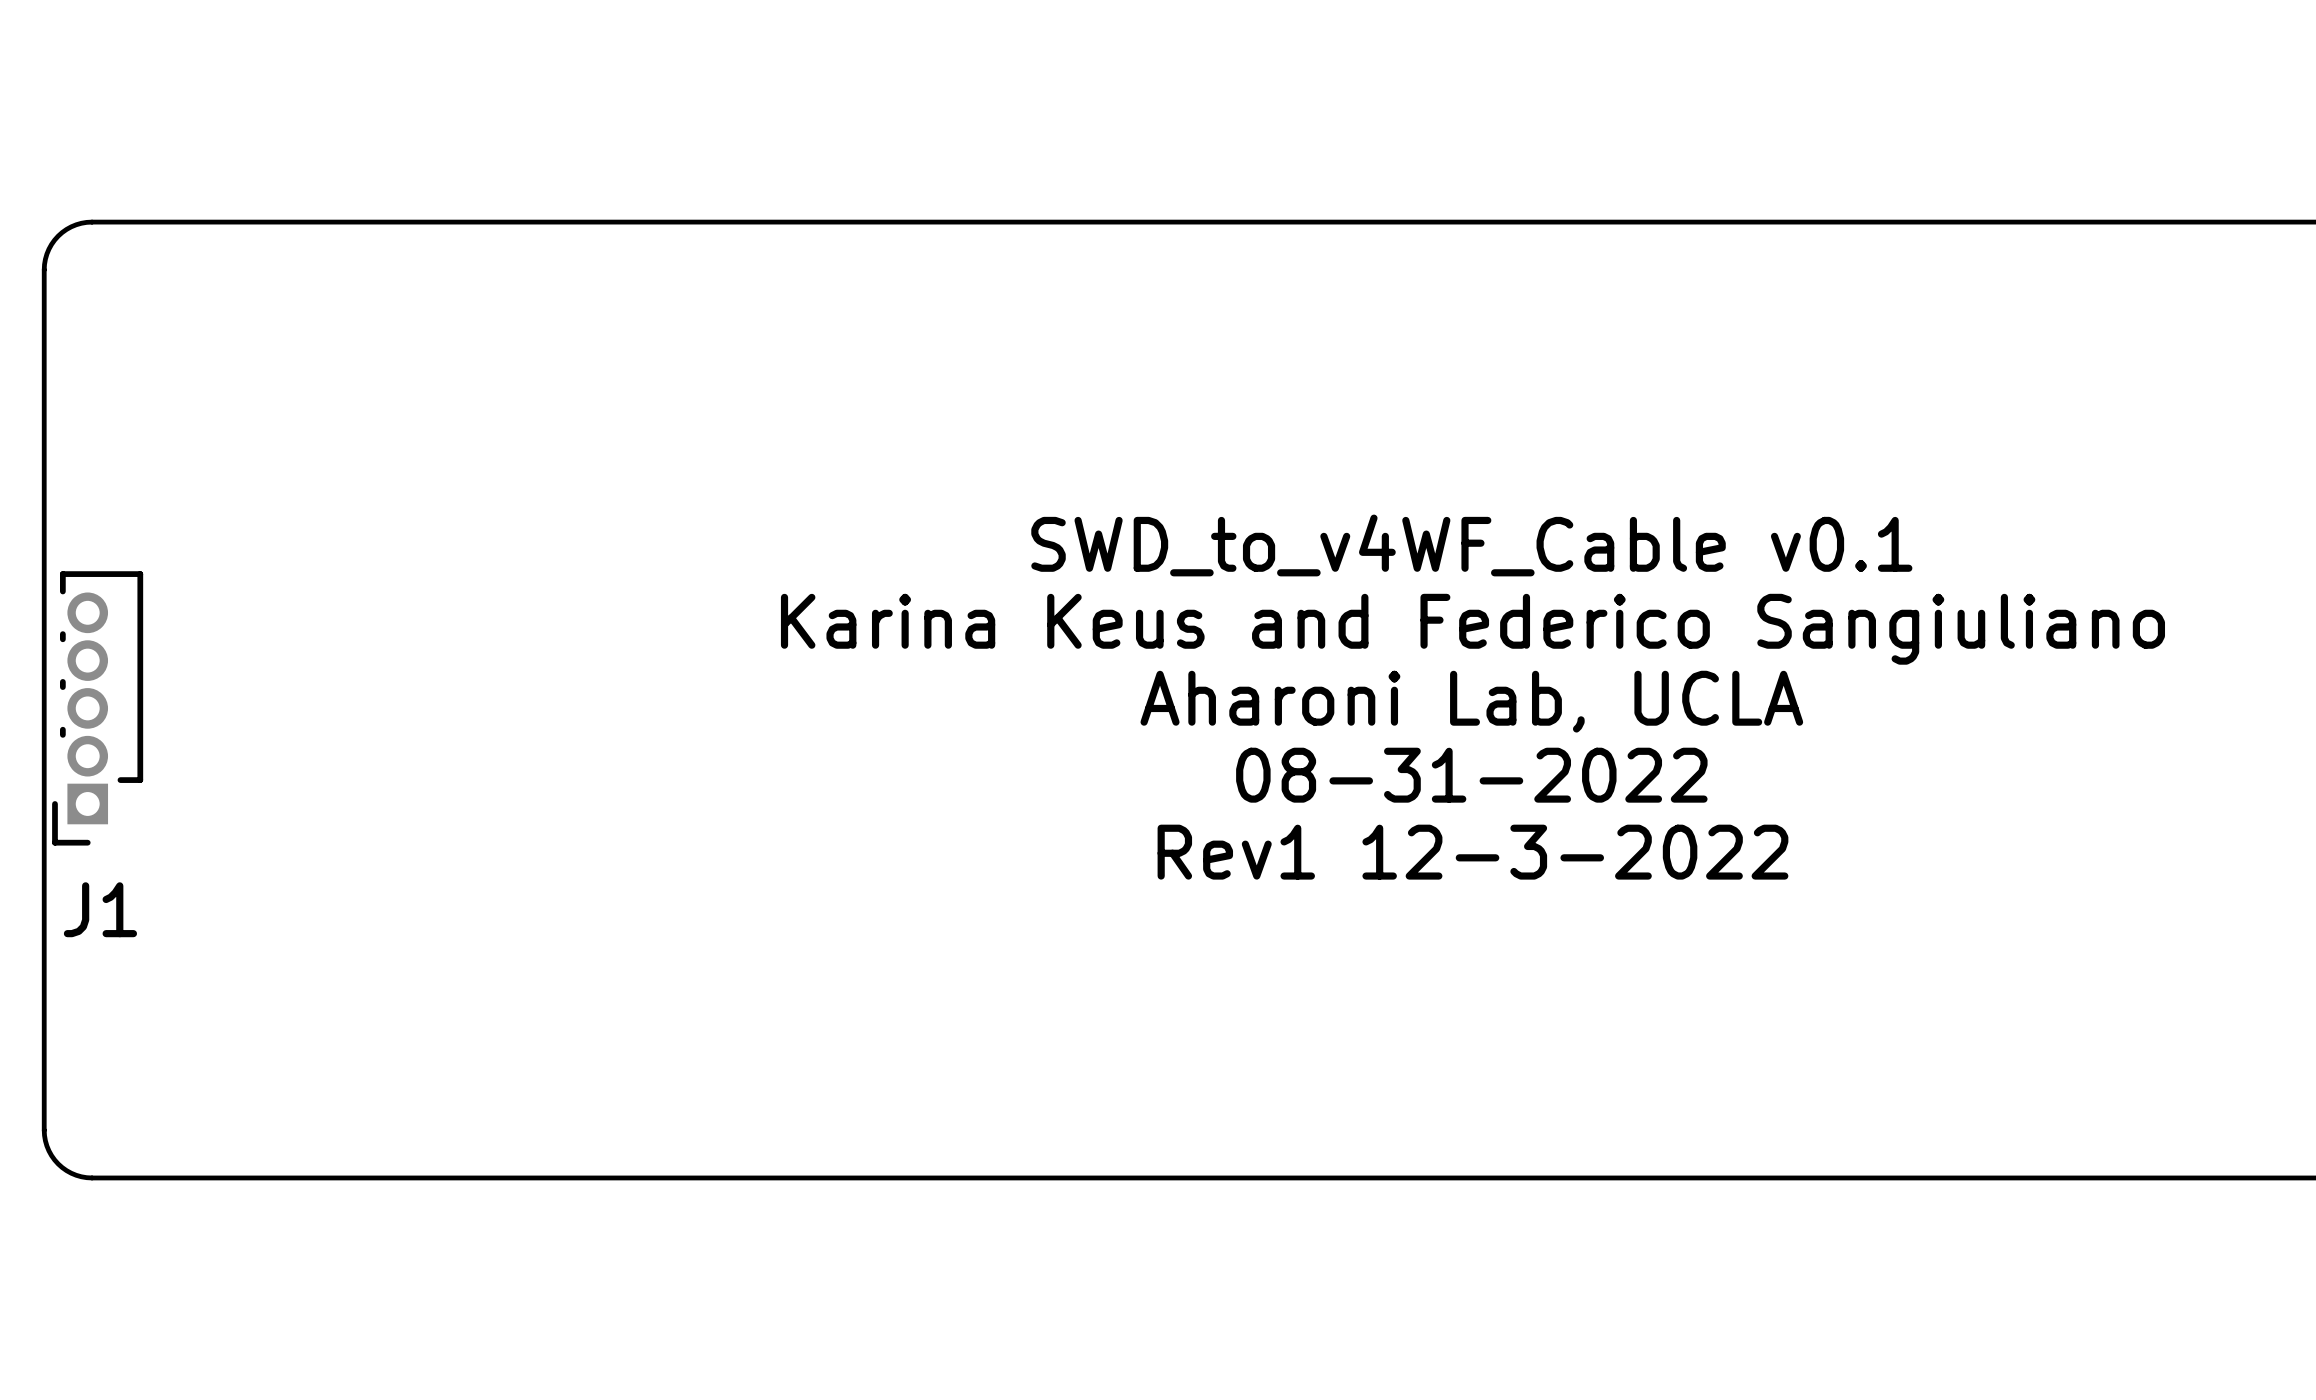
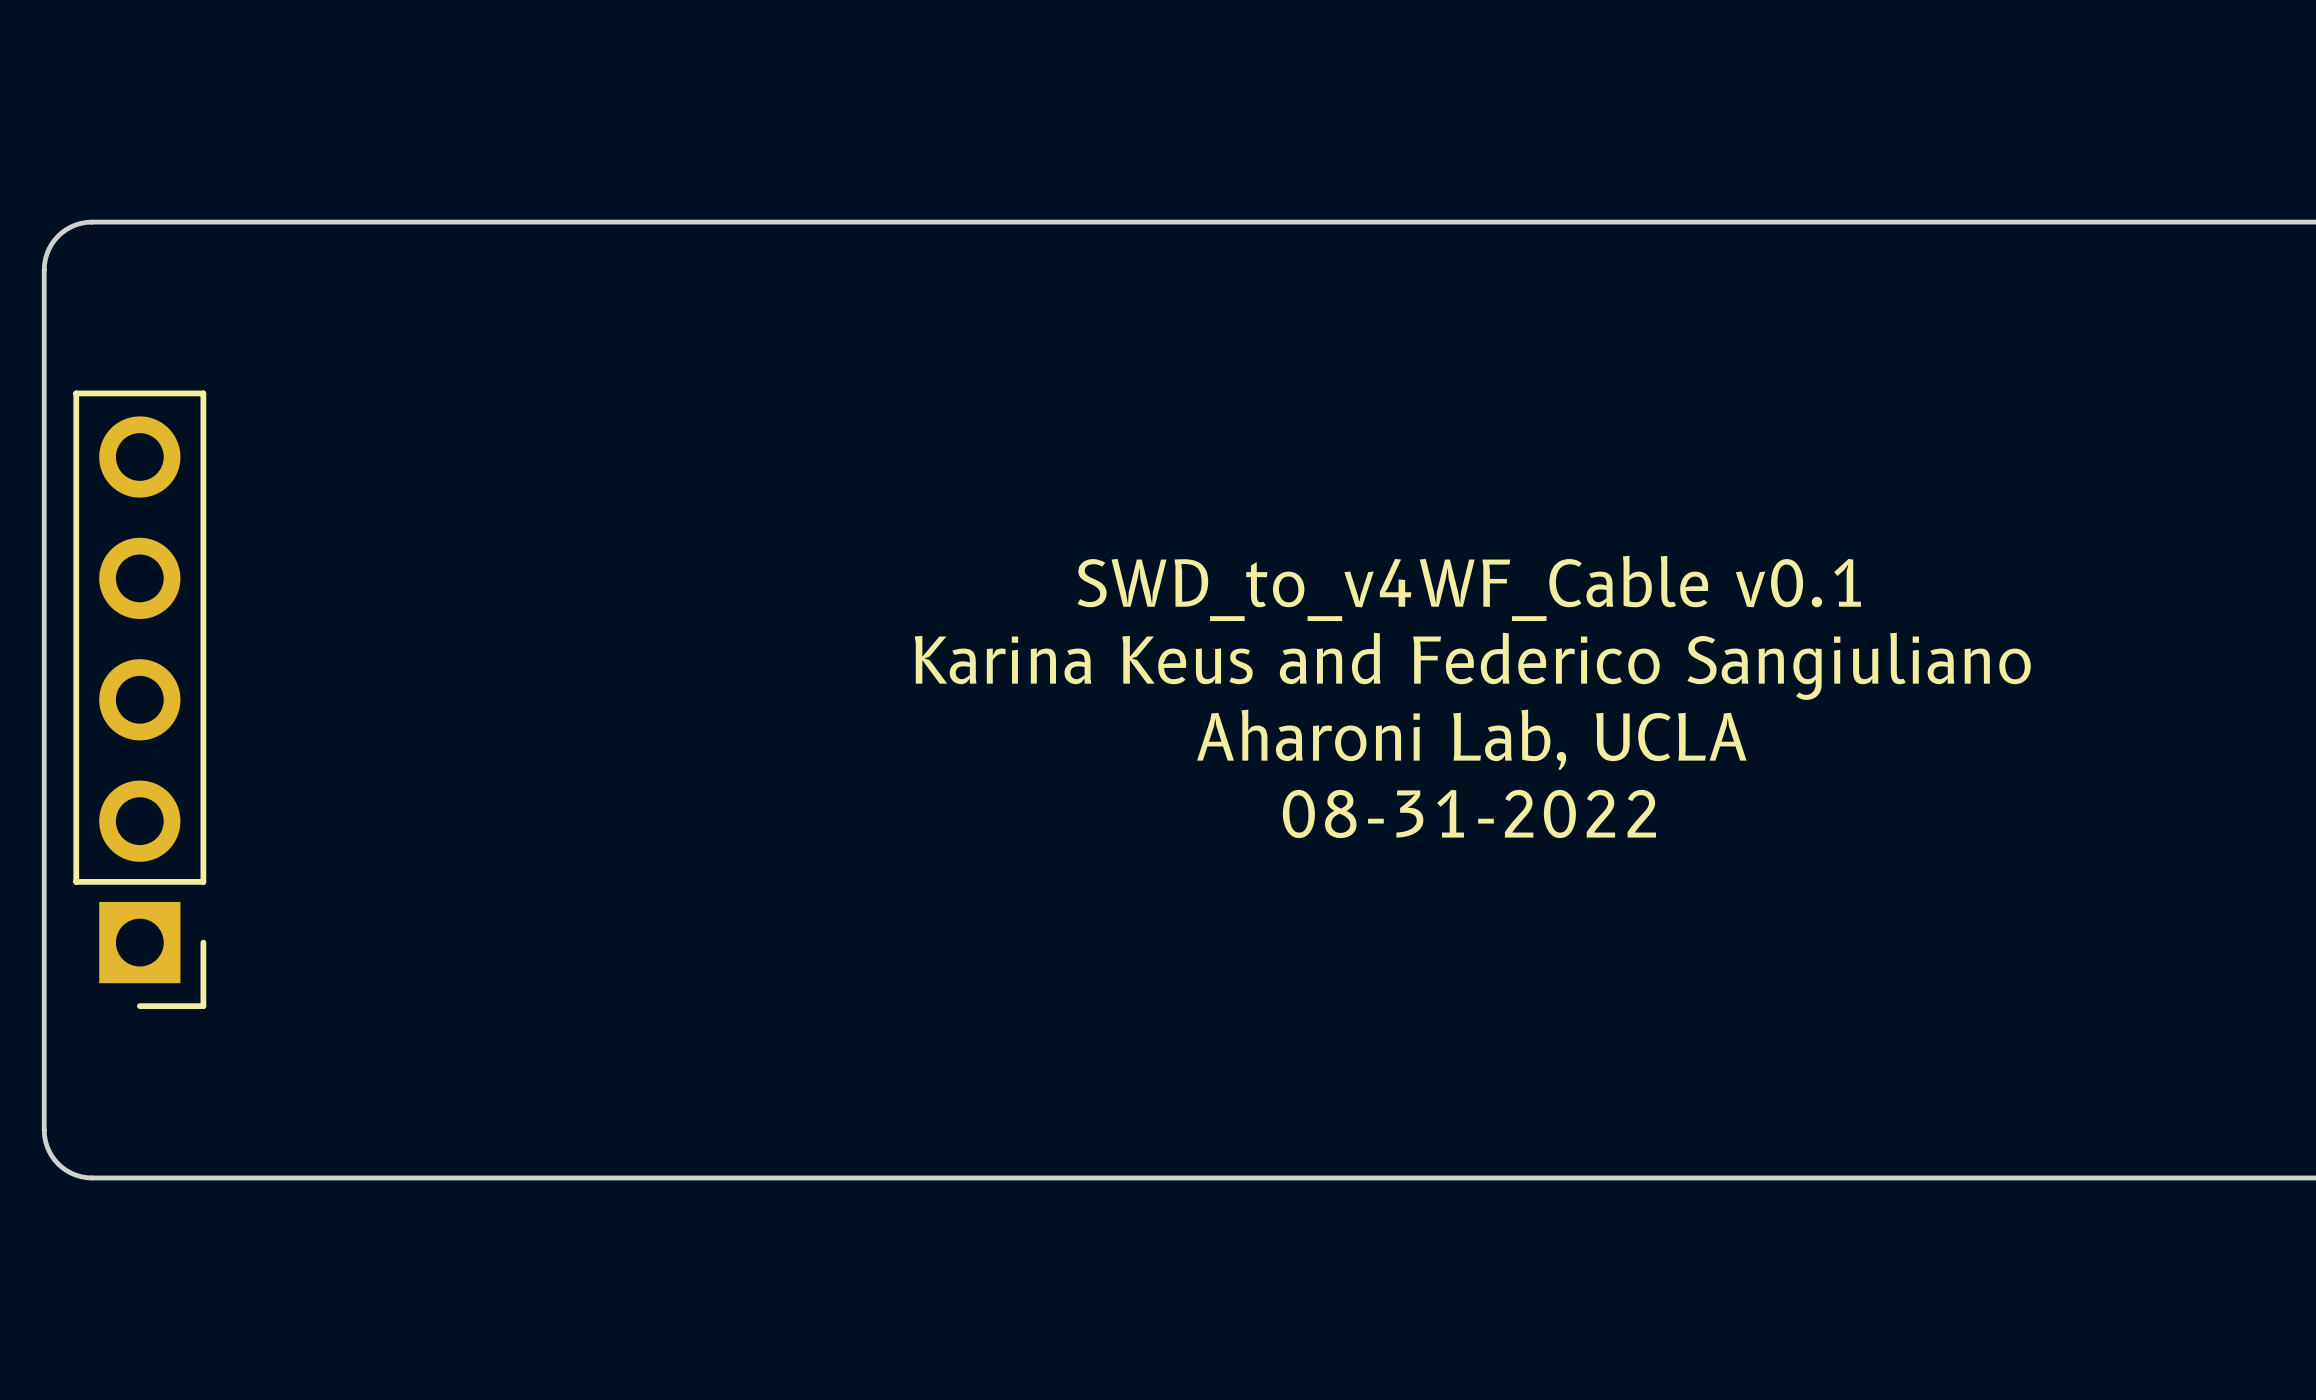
text position: SWD_to_v4WF_Cable v0.1 (1471, 545) -> SWD_to_v4WF_Cable v0.1 (1469, 588)
text position: Karina Keus and Federico Sangiuliano (1472, 629) -> Karina Keus and Federico Sangiuliano (1472, 666)
part: none -> (139, 699)
text position: Aharoni Lab, UCLA (1471, 701) -> Aharoni Lab, UCLA (1471, 739)
J1: (97, 708) -> none
text position: 08-31-2022 (1471, 775) -> 08-31-2022 (1469, 813)
text: Rev1 12-3-2022 (1472, 852) -> none

